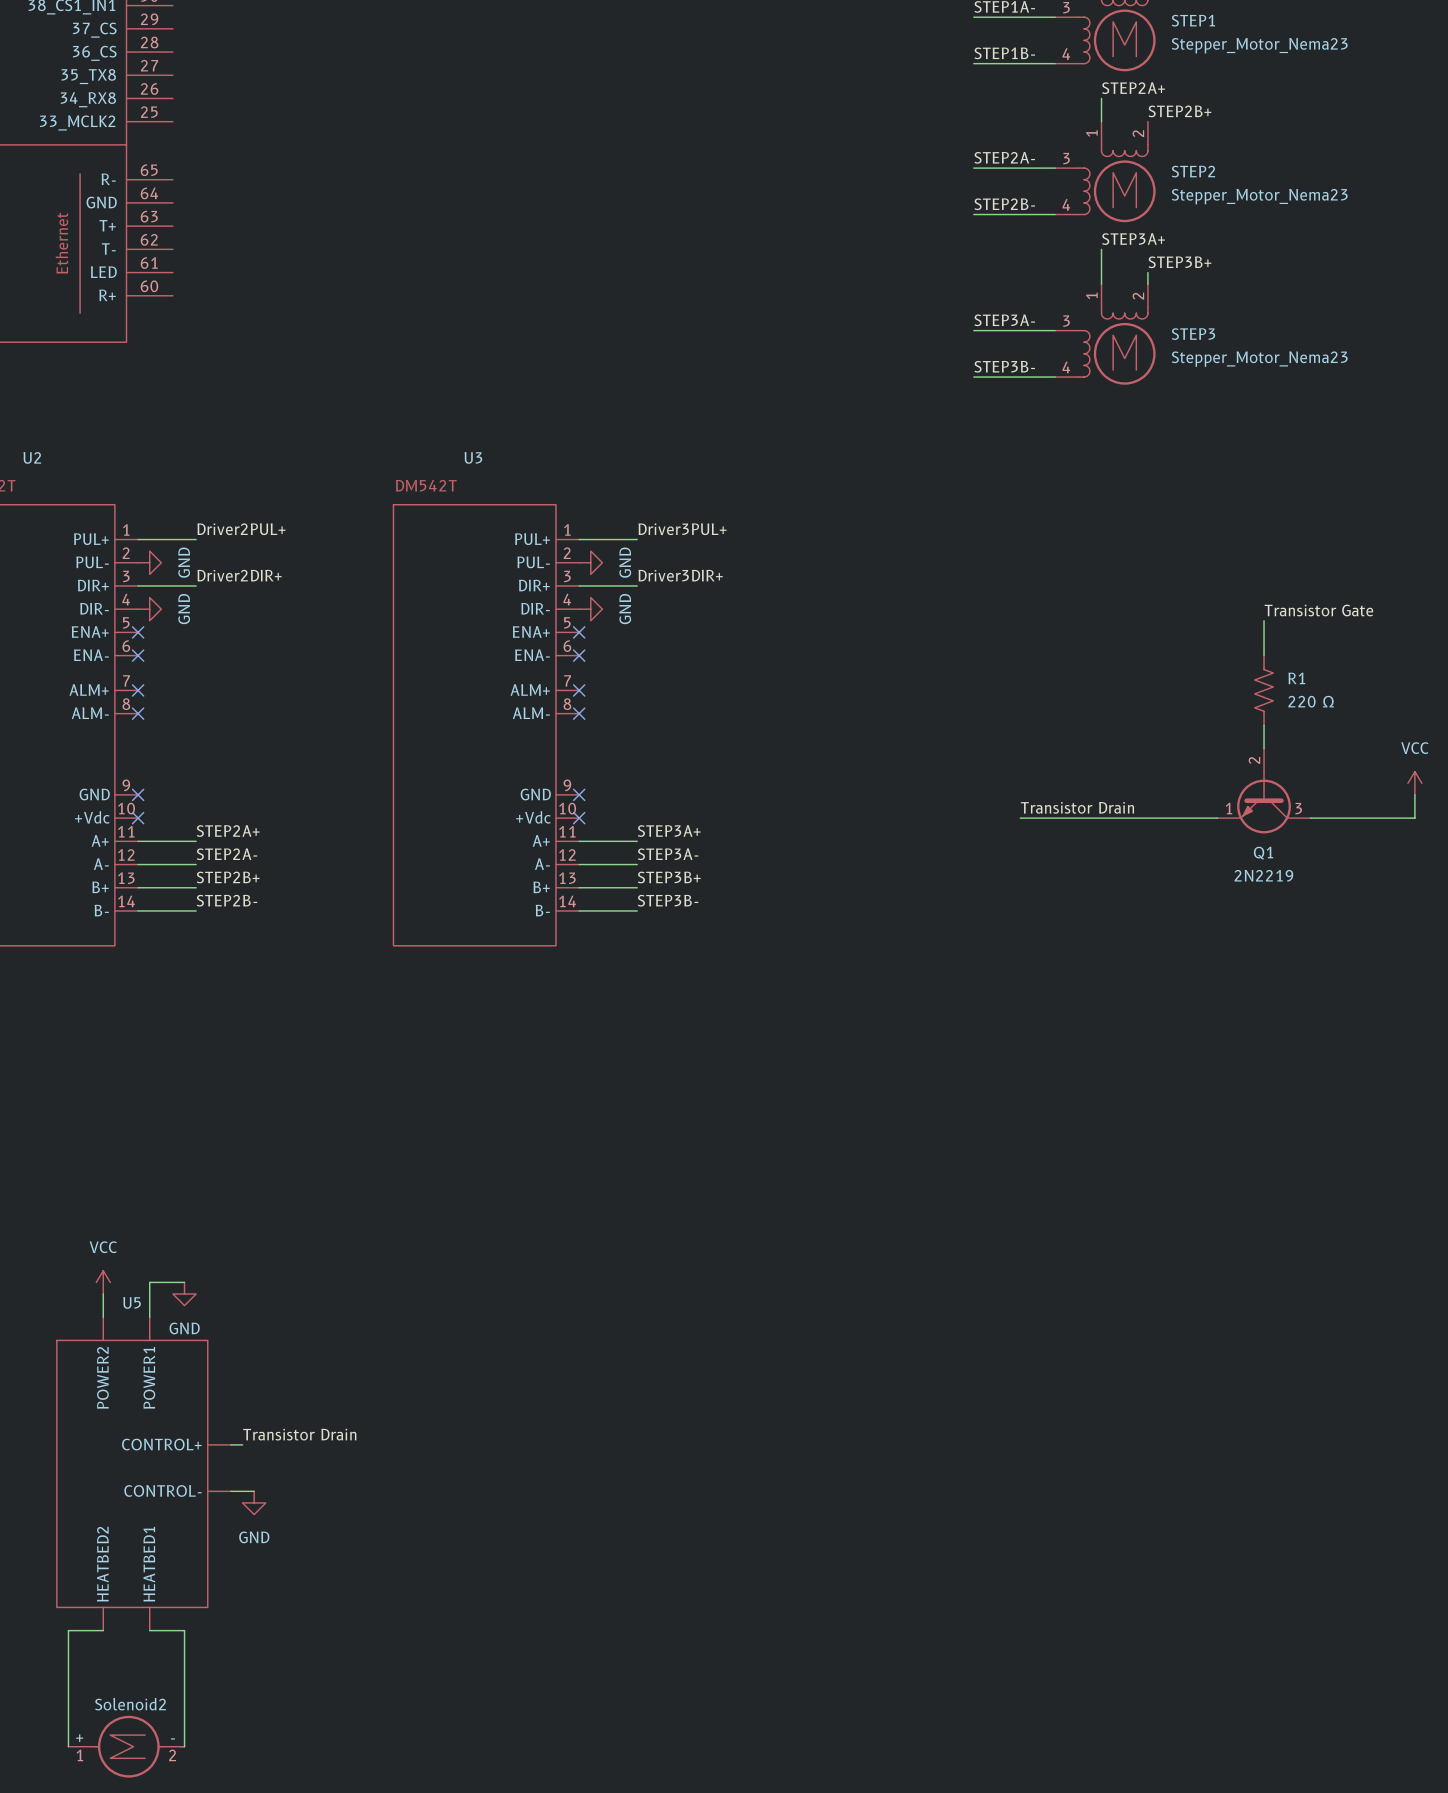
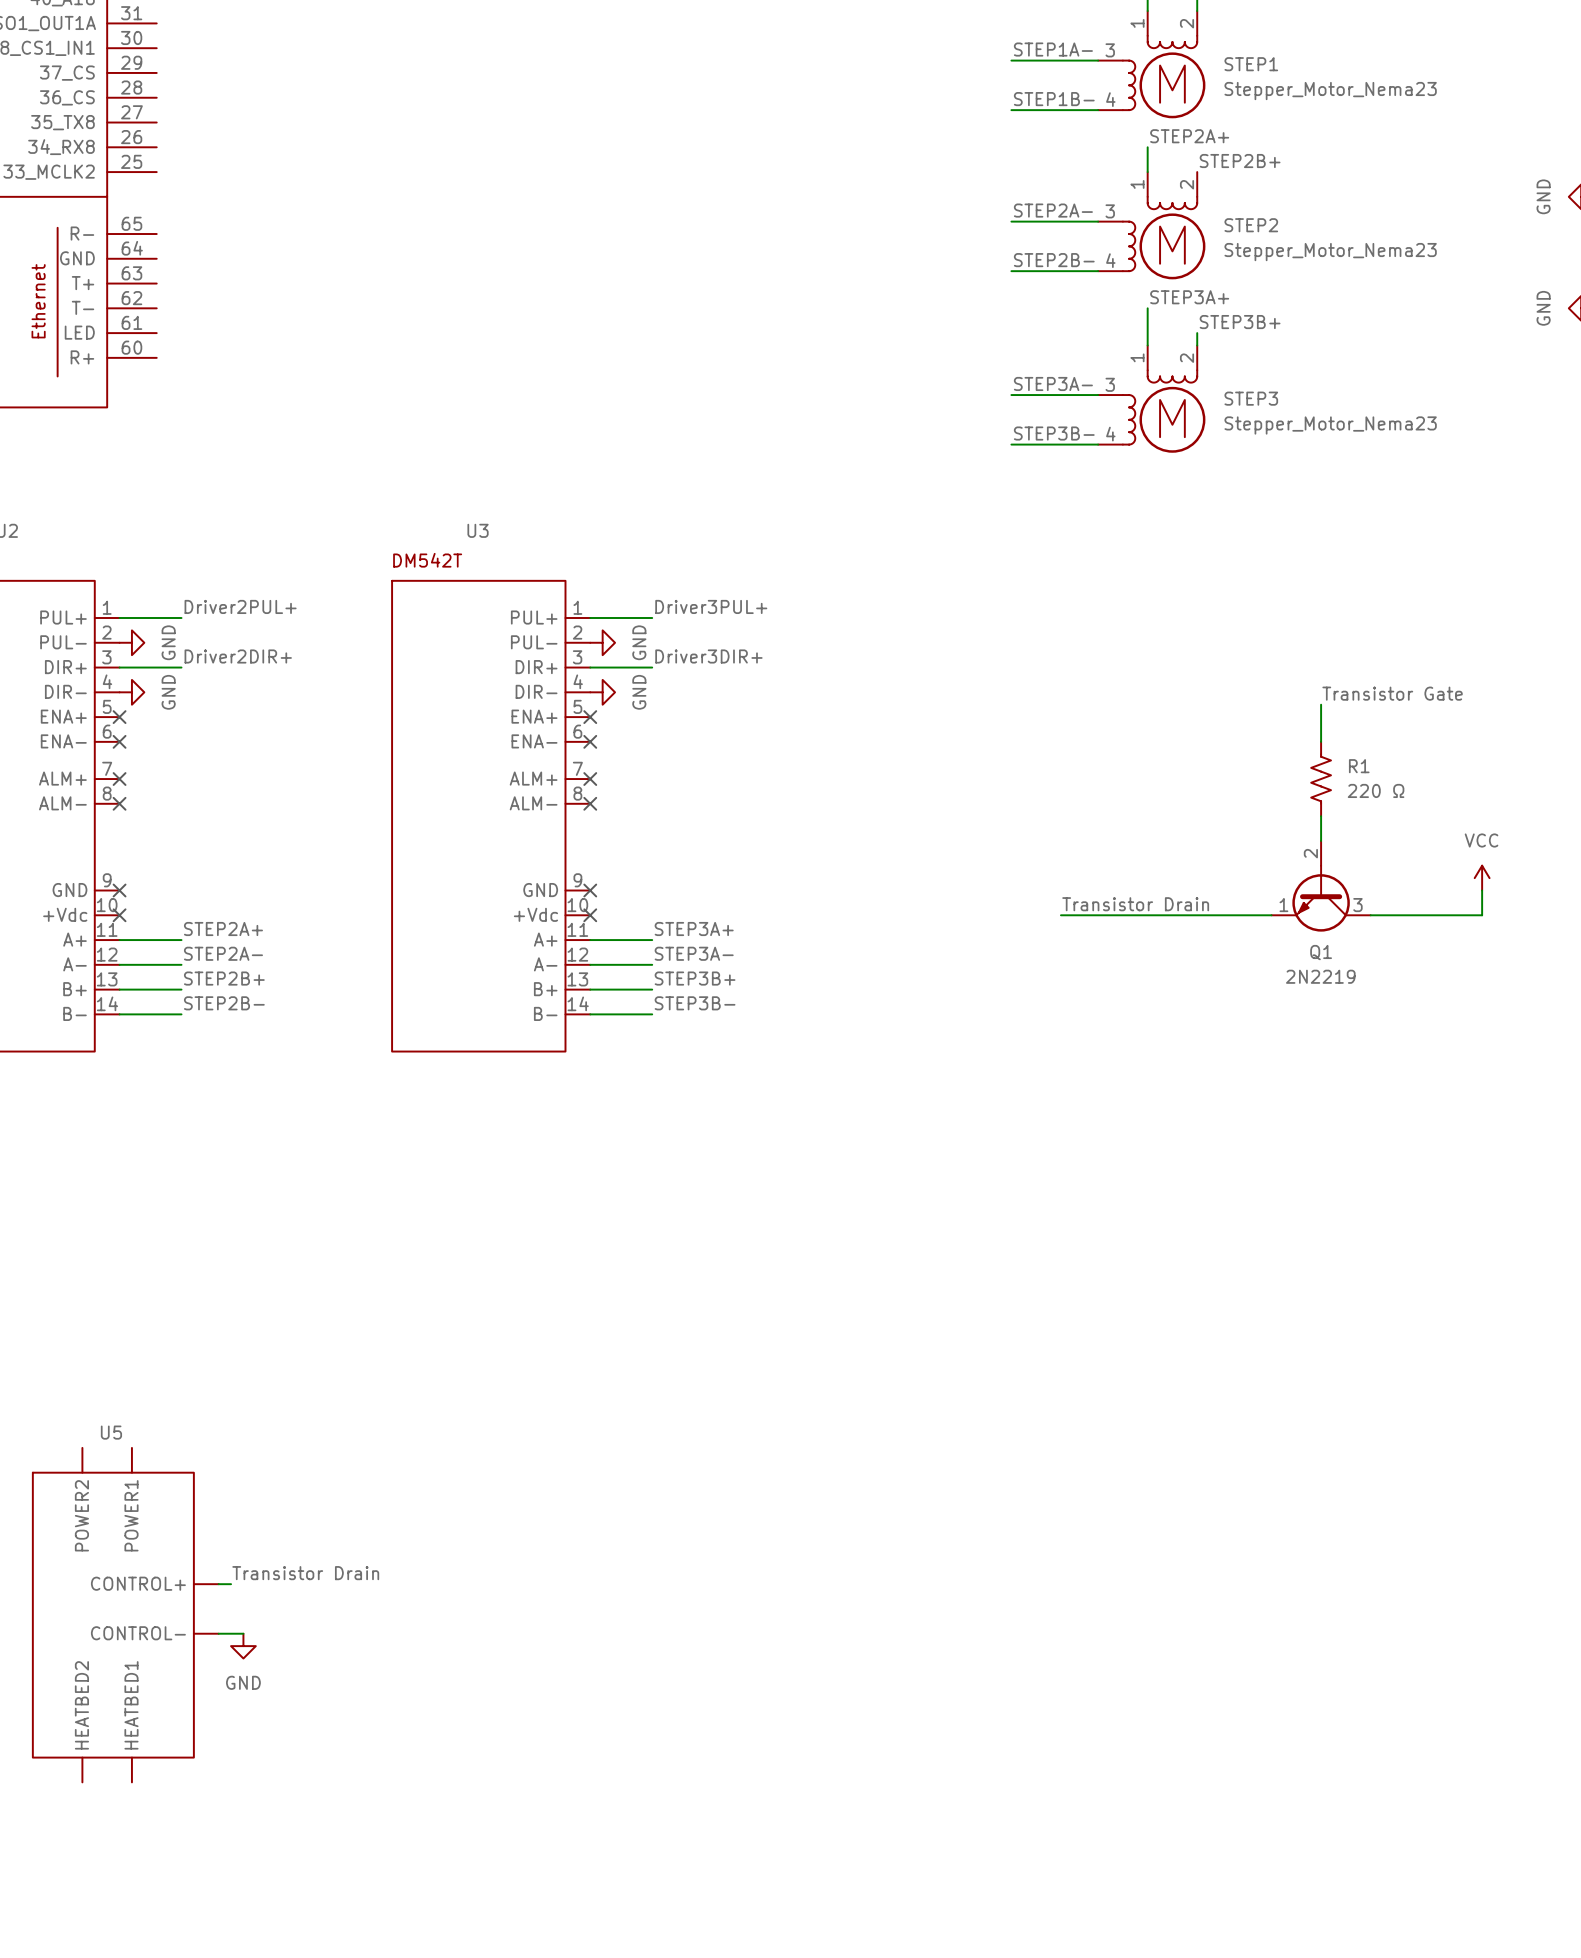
power symbol: VCC (103, 1282) -> none
wire: (184, 1282) (149, 1282) (149, 1317) -> none
wire: (103, 1294) (103, 1317) -> none
power symbol: GND (184, 1294) -> none
wire: (103, 1630) (68, 1630) (68, 1746) -> none
wire: (149, 1630) (184, 1630) (184, 1746) -> none
Solenoid2: (126, 1746) -> none

